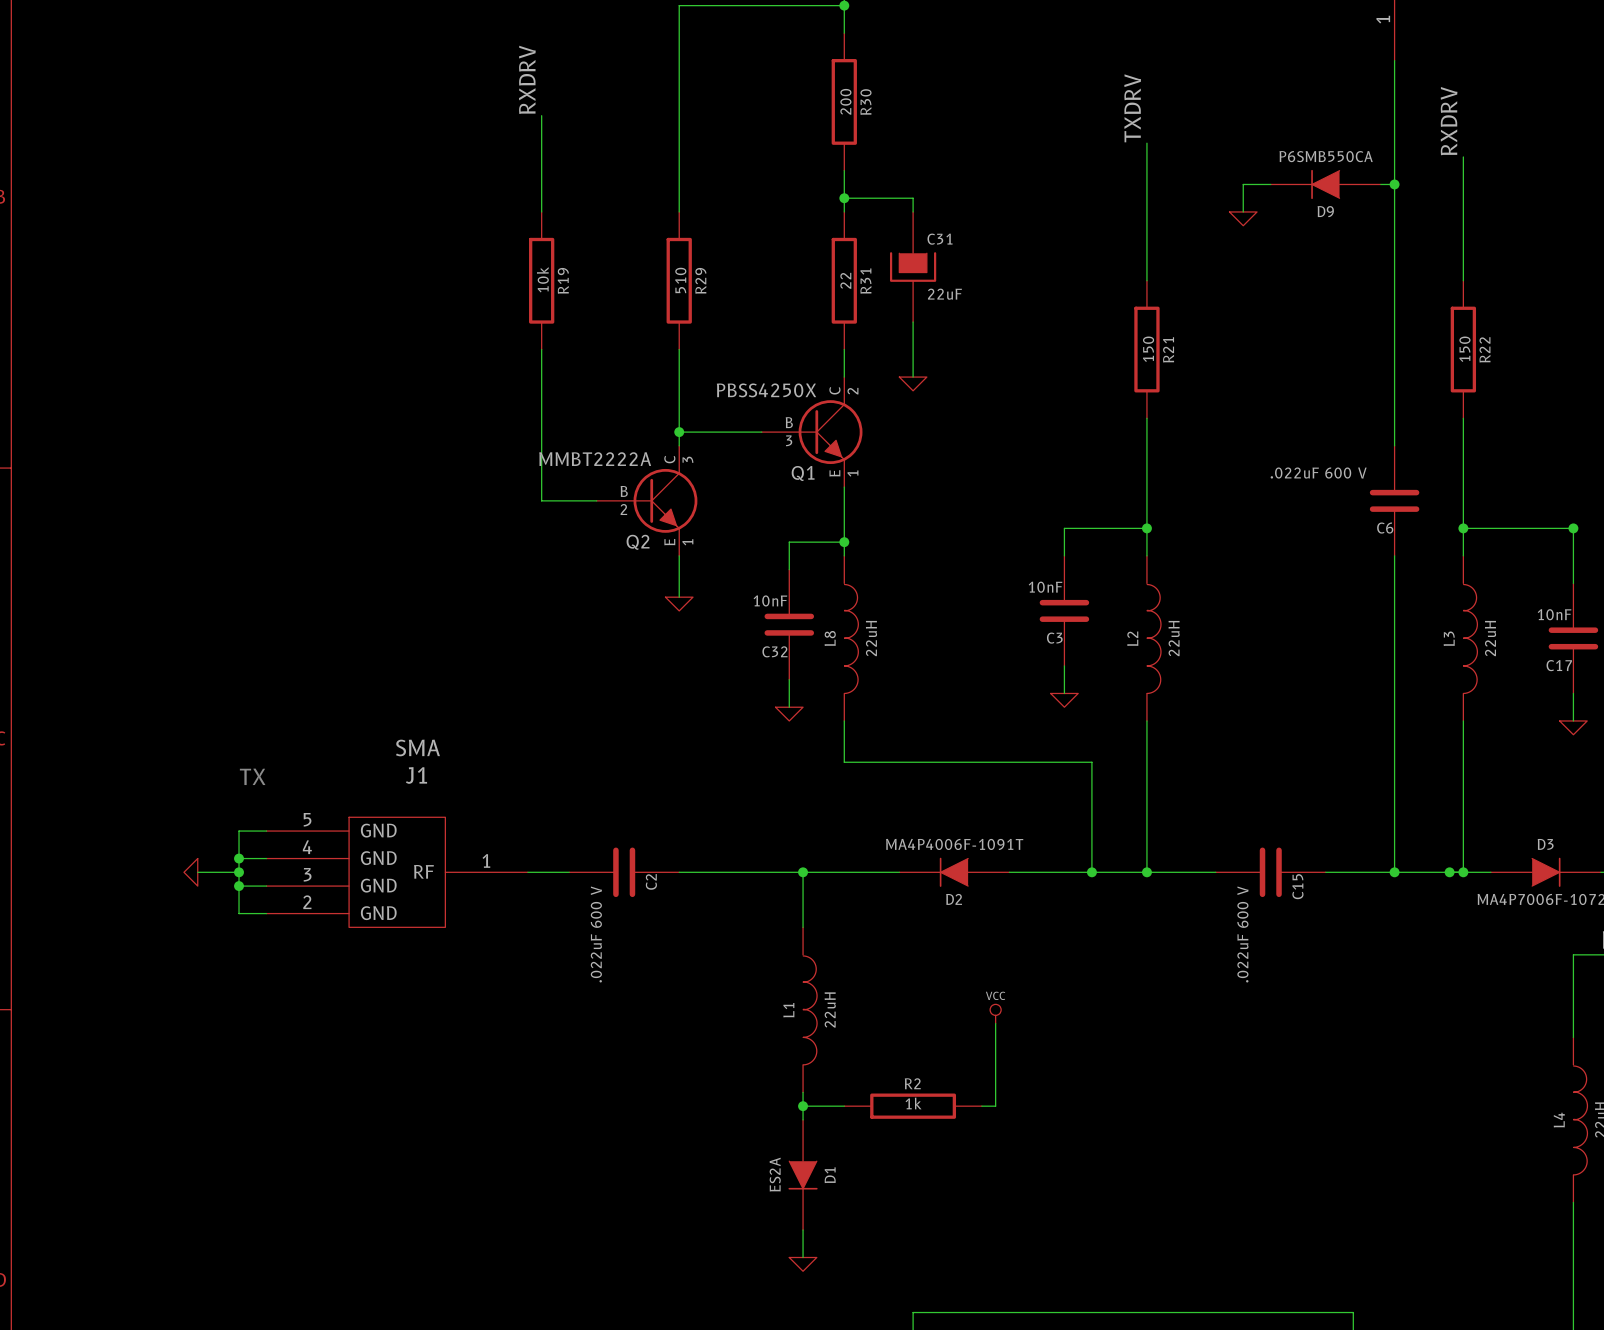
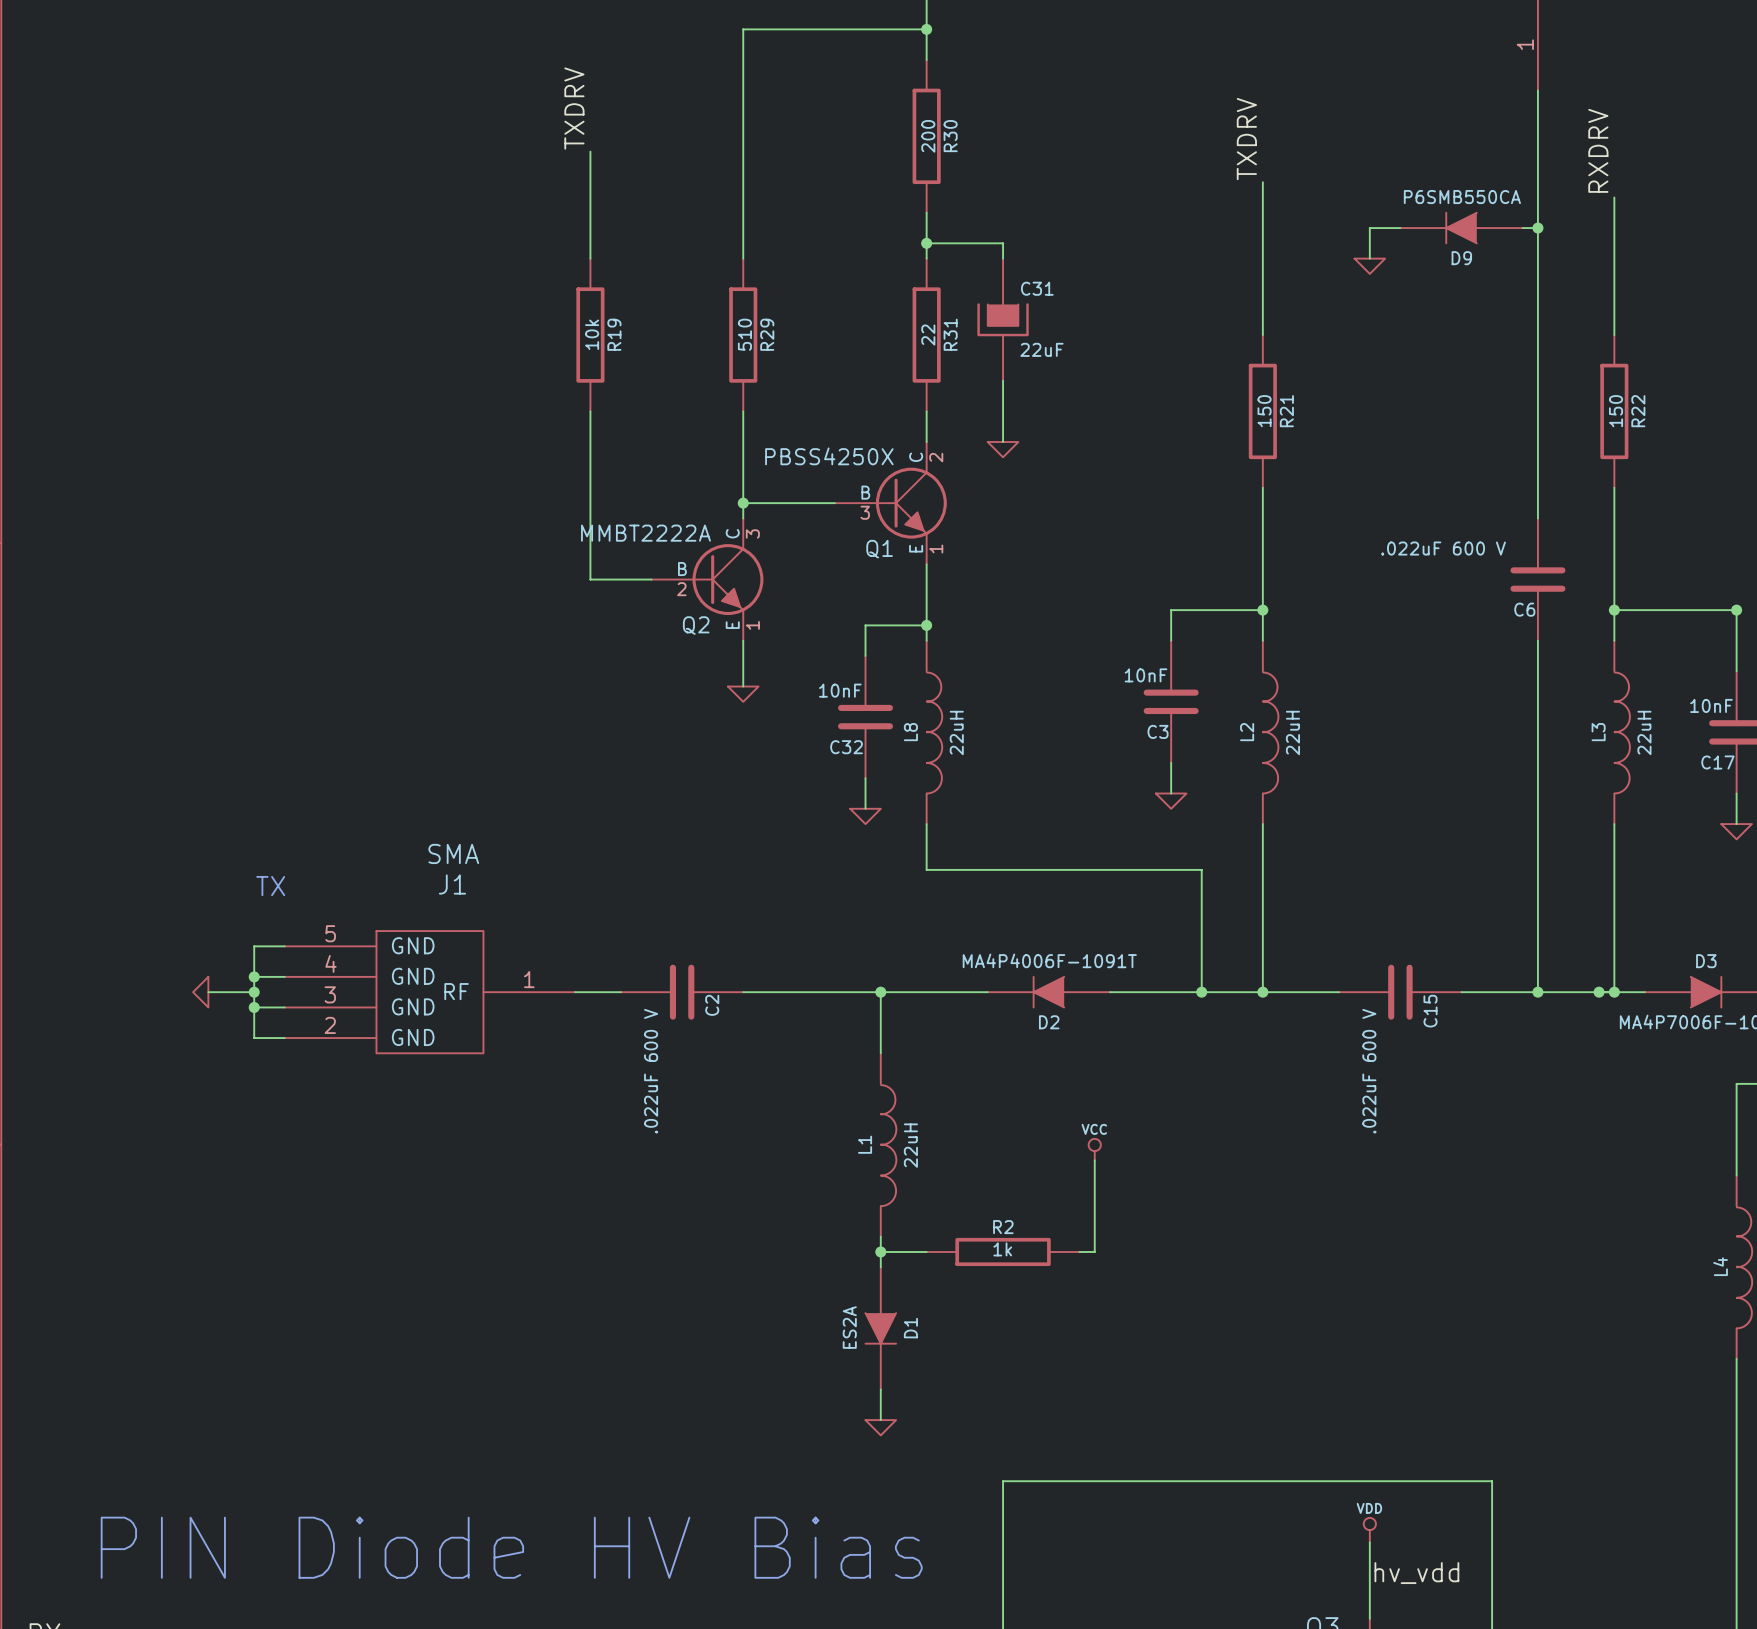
label: RXDRV (527, 79) -> TXDRV (574, 108)

